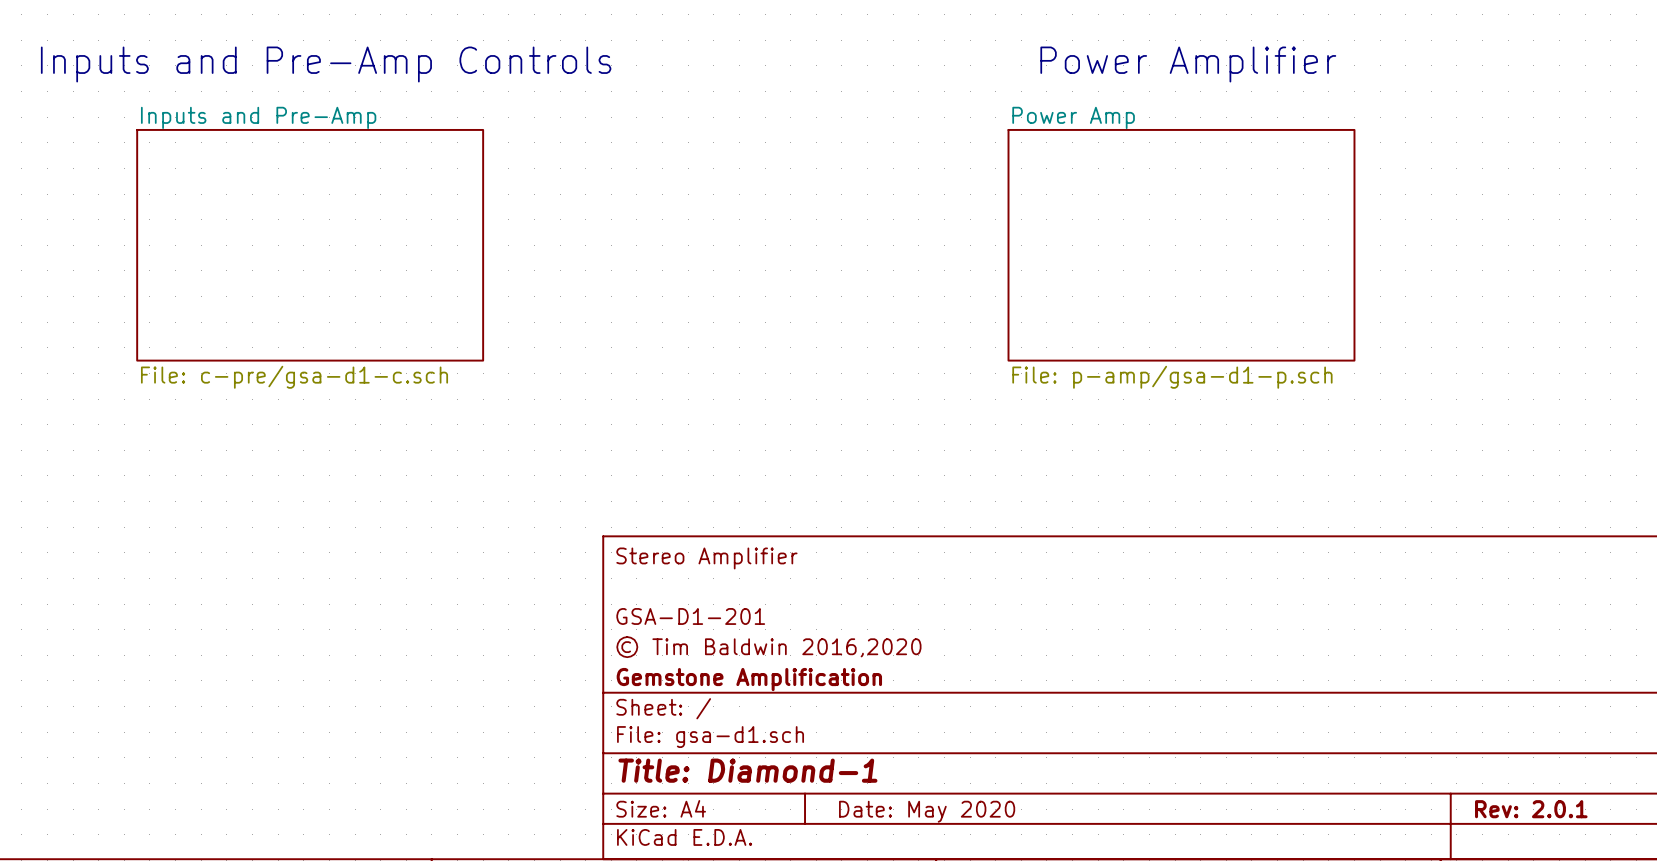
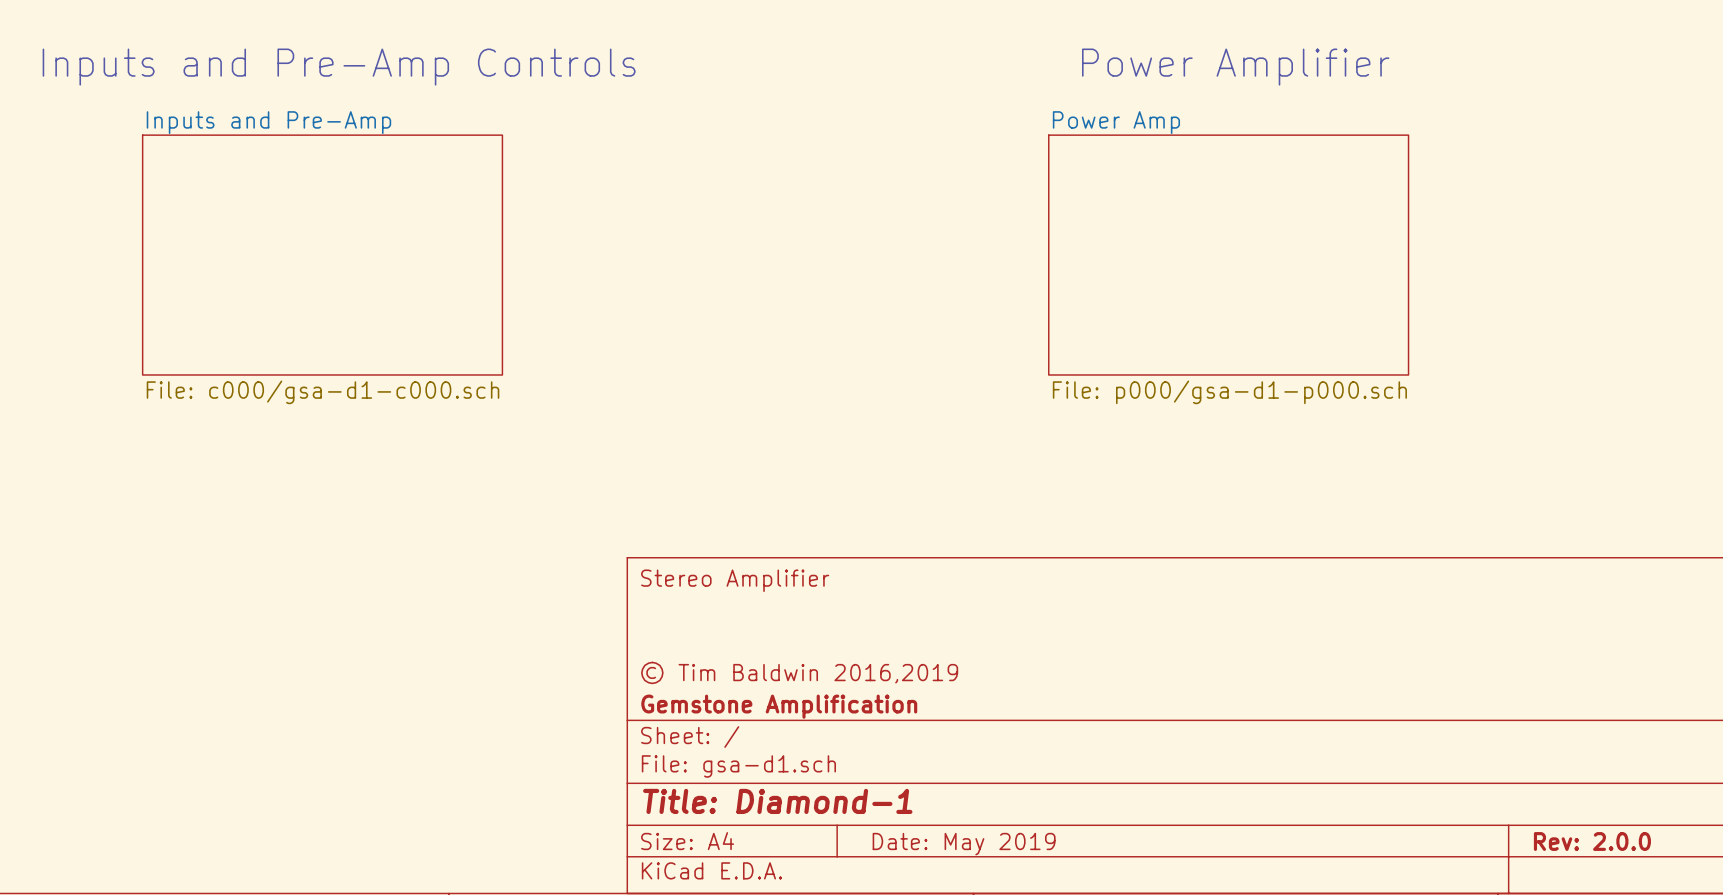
sheet Inputs and Pre-Amp value: File: c-pre/gsa-d1-c.sch (294, 377) -> File: c000/gsa-d1-c000.sch (323, 392)
sheet Power Amp value: File: p-amp/gsa-d1-p.sch (1172, 377) -> File: p000/gsa-d1-p000.sch (1229, 392)
title block: GSA-D1-201 (690, 616) -> none
title block: © Tim Baldwin 2016,2020 (768, 647) -> © Tim Baldwin 2016,2019 (799, 672)
title block: Rev: 2.0.1 (1531, 809) -> Rev: 2.0.0 (1592, 841)
title block: Date: May 2020 (927, 811) -> Date: May 2019 (964, 844)

